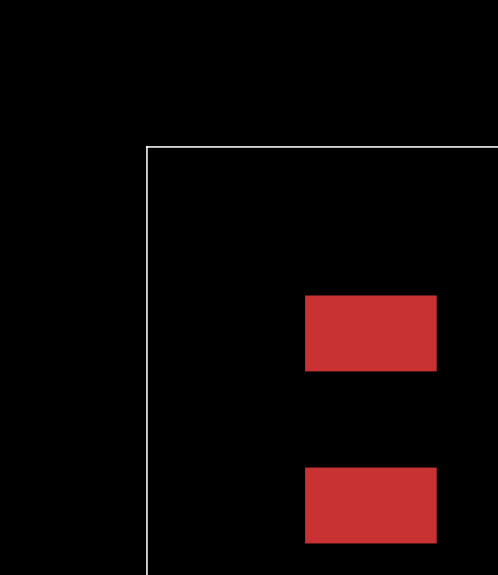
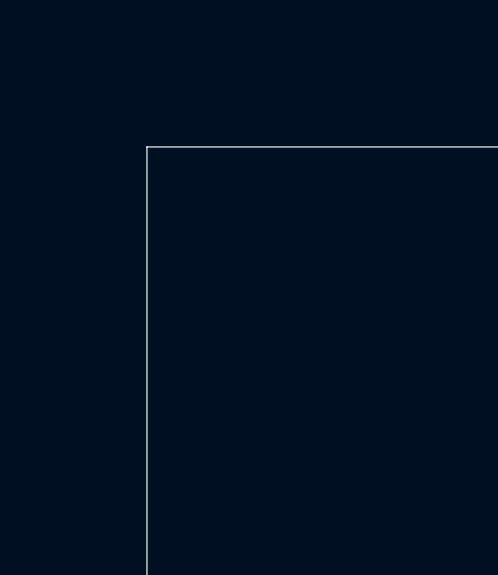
part: (370, 419) -> none

